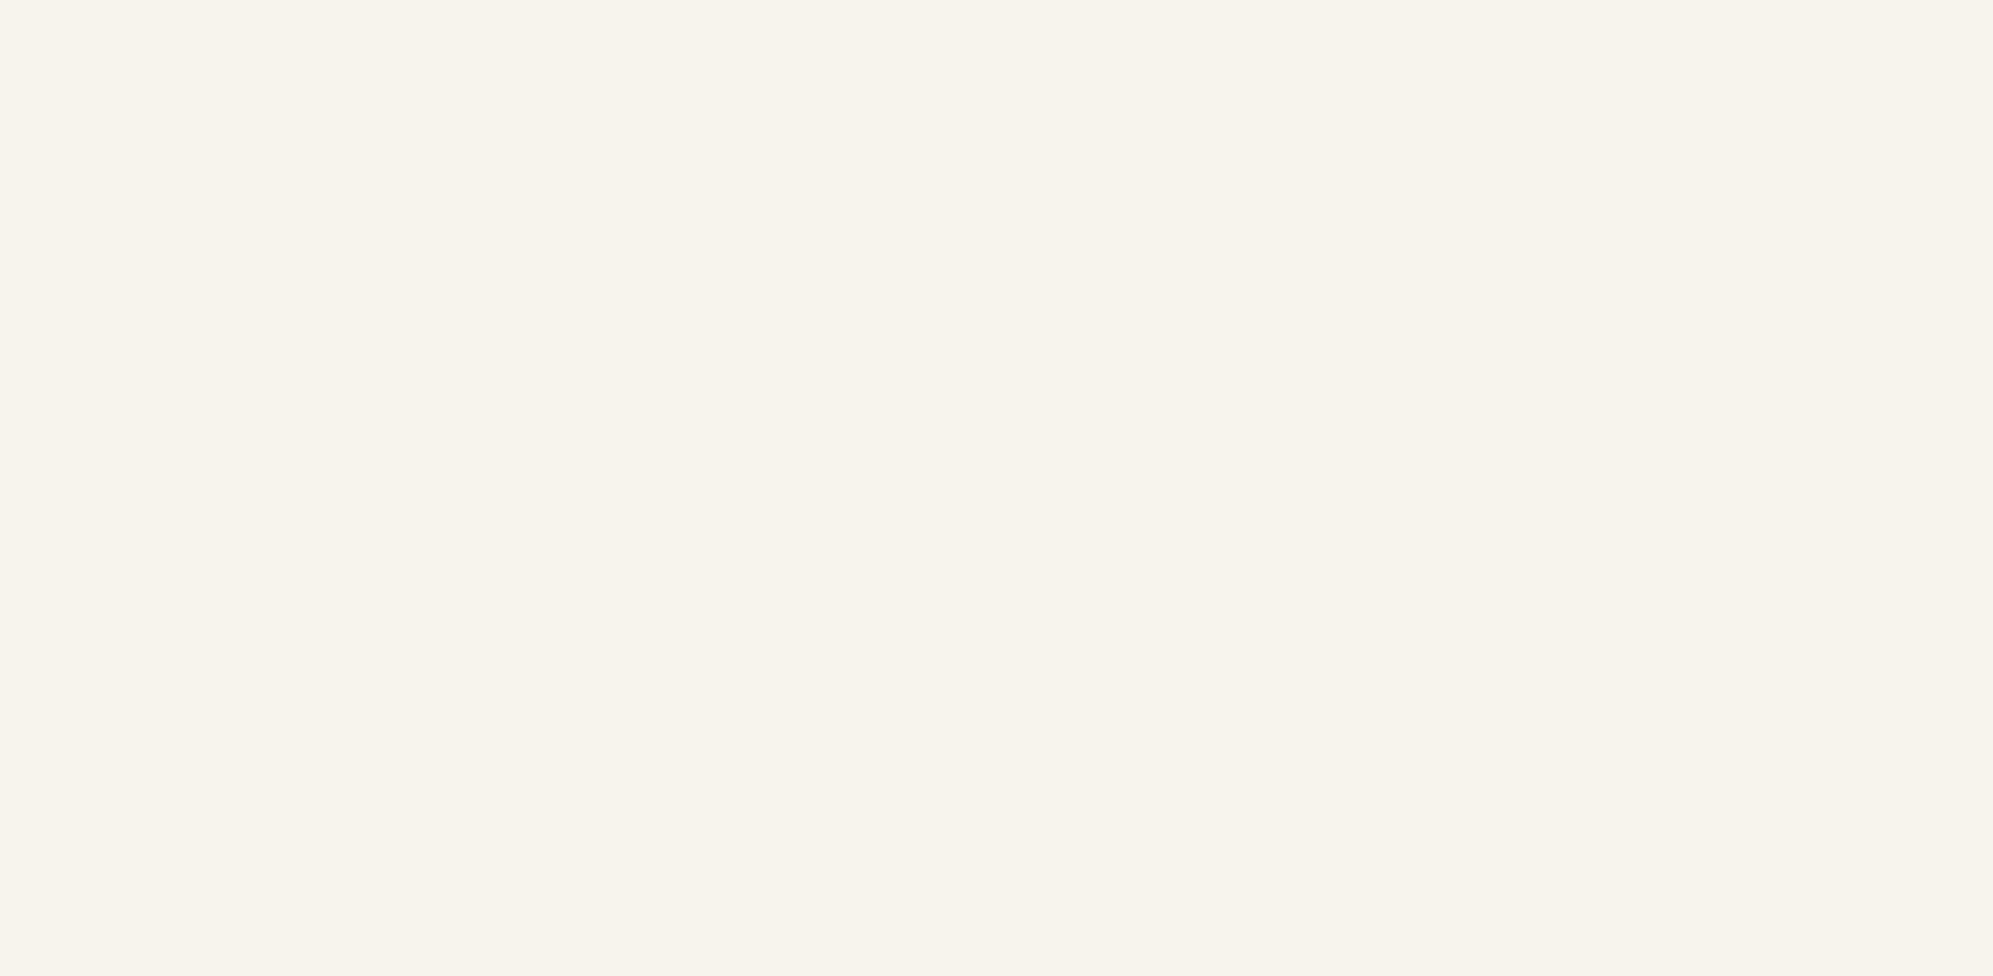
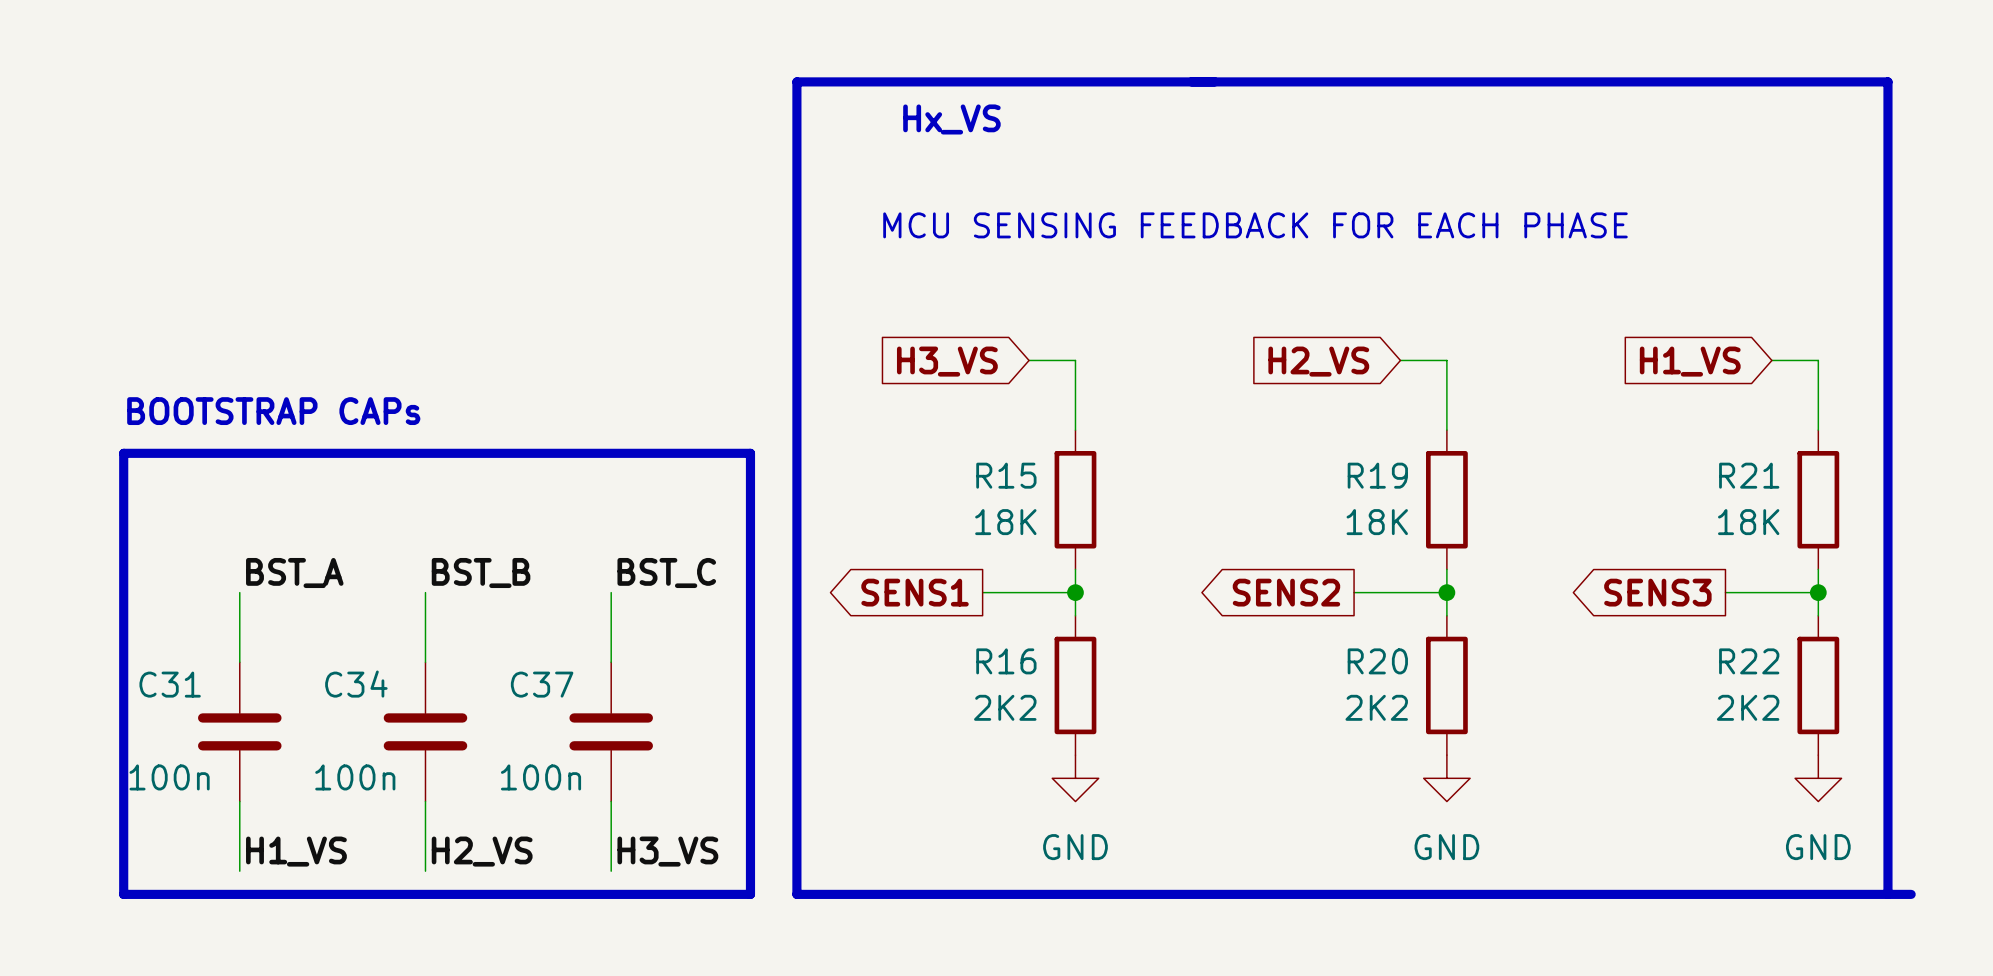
text: none -> Hx_VS (951, 119)
text: none -> MCU SENSING FEEDBACK FOR EACH PHASE (1255, 225)
wire: none -> (1029, 360) (1075, 360) (1075, 430)
wire: none -> (1400, 360) (1446, 360) (1446, 430)
wire: none -> (1771, 360) (1818, 360) (1818, 430)
global label: none -> H3_VS (947, 361)
global label: none -> H2_VS (1318, 361)
global label: none -> H1_VS (1690, 361)
text: none -> BOOTSTRAP CAPs (273, 411)
line: none -> (123, 453) (123, 894) (750, 894) (750, 453) (123, 453)
R15: none -> 18K (1075, 499)
R19: none -> 18K (1446, 499)
R21: none -> 18K (1818, 499)
wire: none -> (1075, 569) (1075, 615)
wire: none -> (1446, 569) (1446, 615)
wire: none -> (1818, 569) (1818, 615)
label: none -> BST_A (294, 573)
label: none -> BST_B (481, 573)
label: none -> BST_C (666, 573)
wire: none -> (239, 592) (239, 662)
wire: none -> (425, 592) (425, 662)
wire: none -> (611, 592) (611, 662)
global label: none -> SENS1 (915, 592)
wire: none -> (982, 592) (1075, 592)
junction: none -> (1075, 592)
global label: none -> SENS2 (1286, 592)
wire: none -> (1354, 592) (1446, 592)
junction: none -> (1446, 592)
global label: none -> SENS3 (1657, 592)
wire: none -> (1725, 592) (1818, 592)
junction: none -> (1818, 592)
R16: none -> 2K2 (1075, 685)
R20: none -> 2K2 (1446, 685)
R22: none -> 2K2 (1818, 685)
C31: none -> 100n (239, 731)
C34: none -> 100n (425, 731)
C37: none -> 100n (611, 731)
power symbol: none -> GND (1075, 778)
power symbol: none -> GND (1446, 778)
power symbol: none -> GND (1818, 778)
wire: none -> (239, 801) (239, 871)
wire: none -> (425, 801) (425, 871)
wire: none -> (611, 801) (611, 871)
label: none -> H1_VS (296, 851)
label: none -> H2_VS (482, 851)
label: none -> H3_VS (667, 851)
line: none -> (1887, 894) (1887, 81) (796, 81) (796, 894) (1911, 894)

